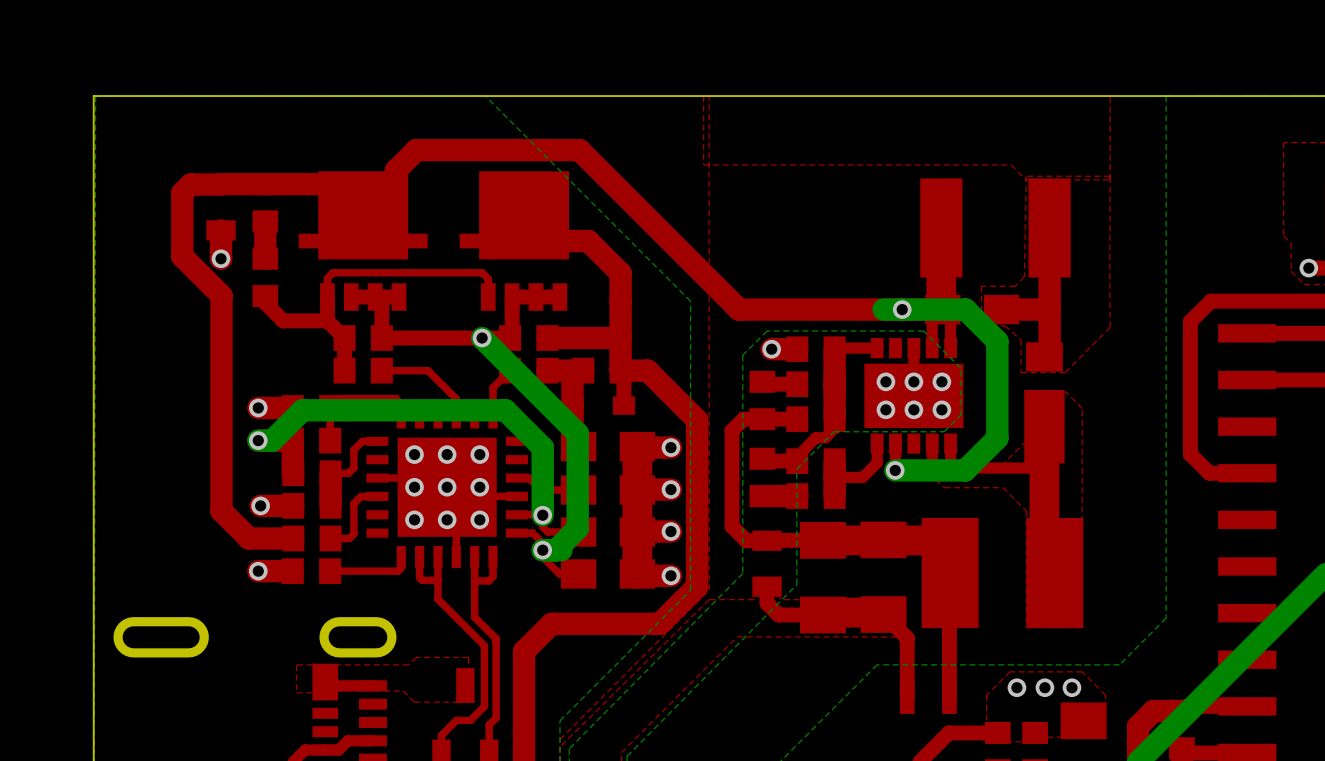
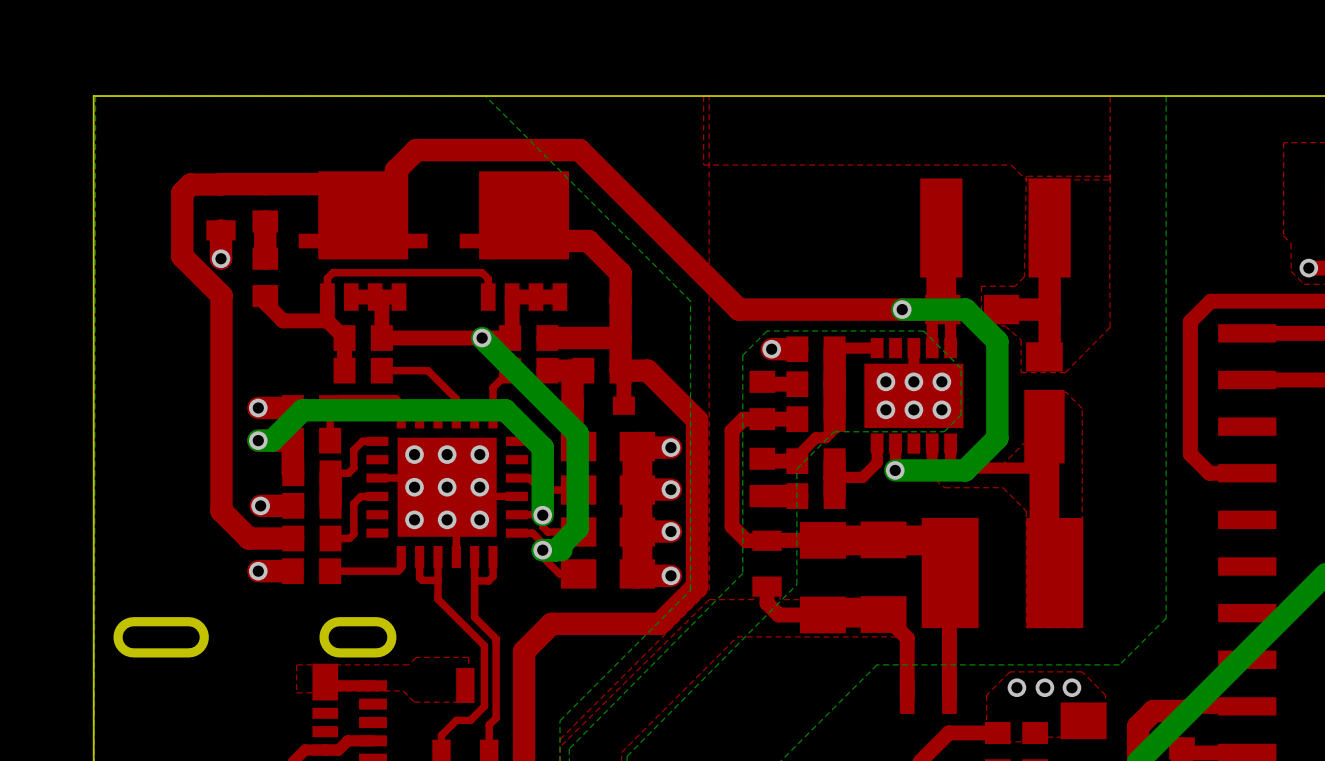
bottom track: (902, 309) (883, 309) -> none

